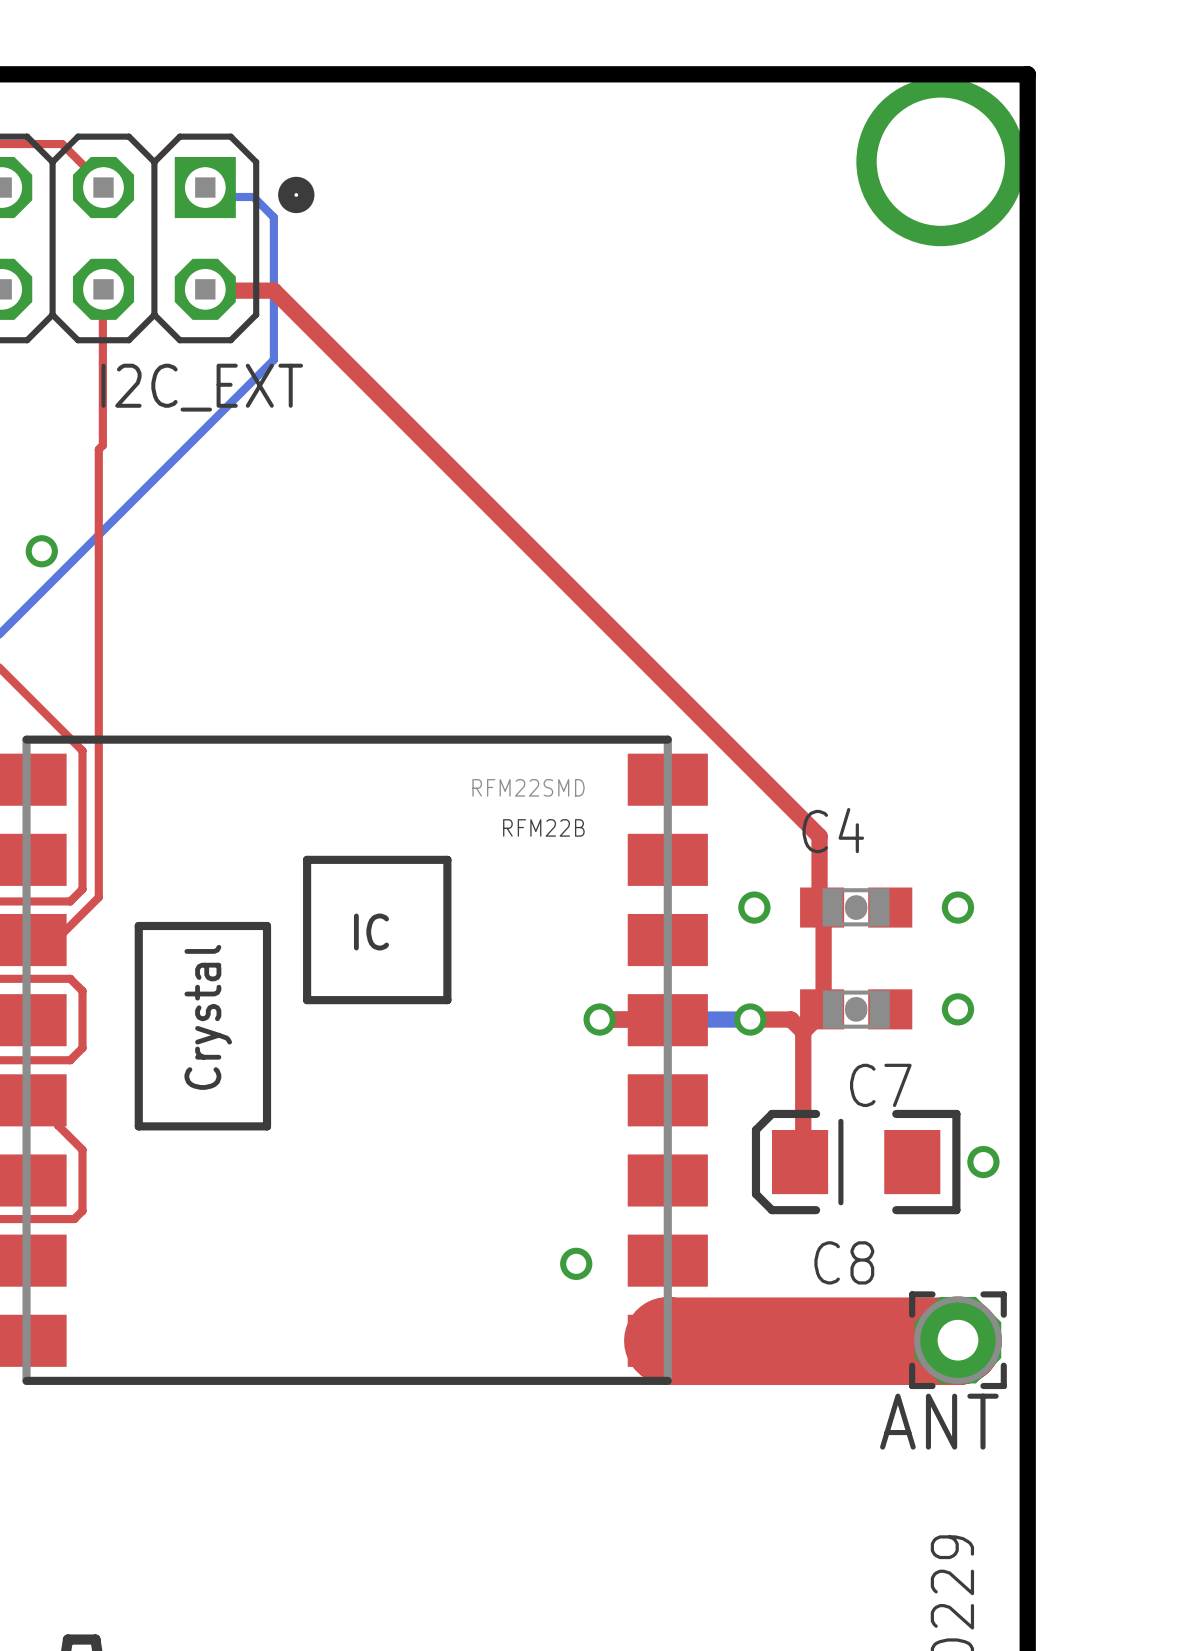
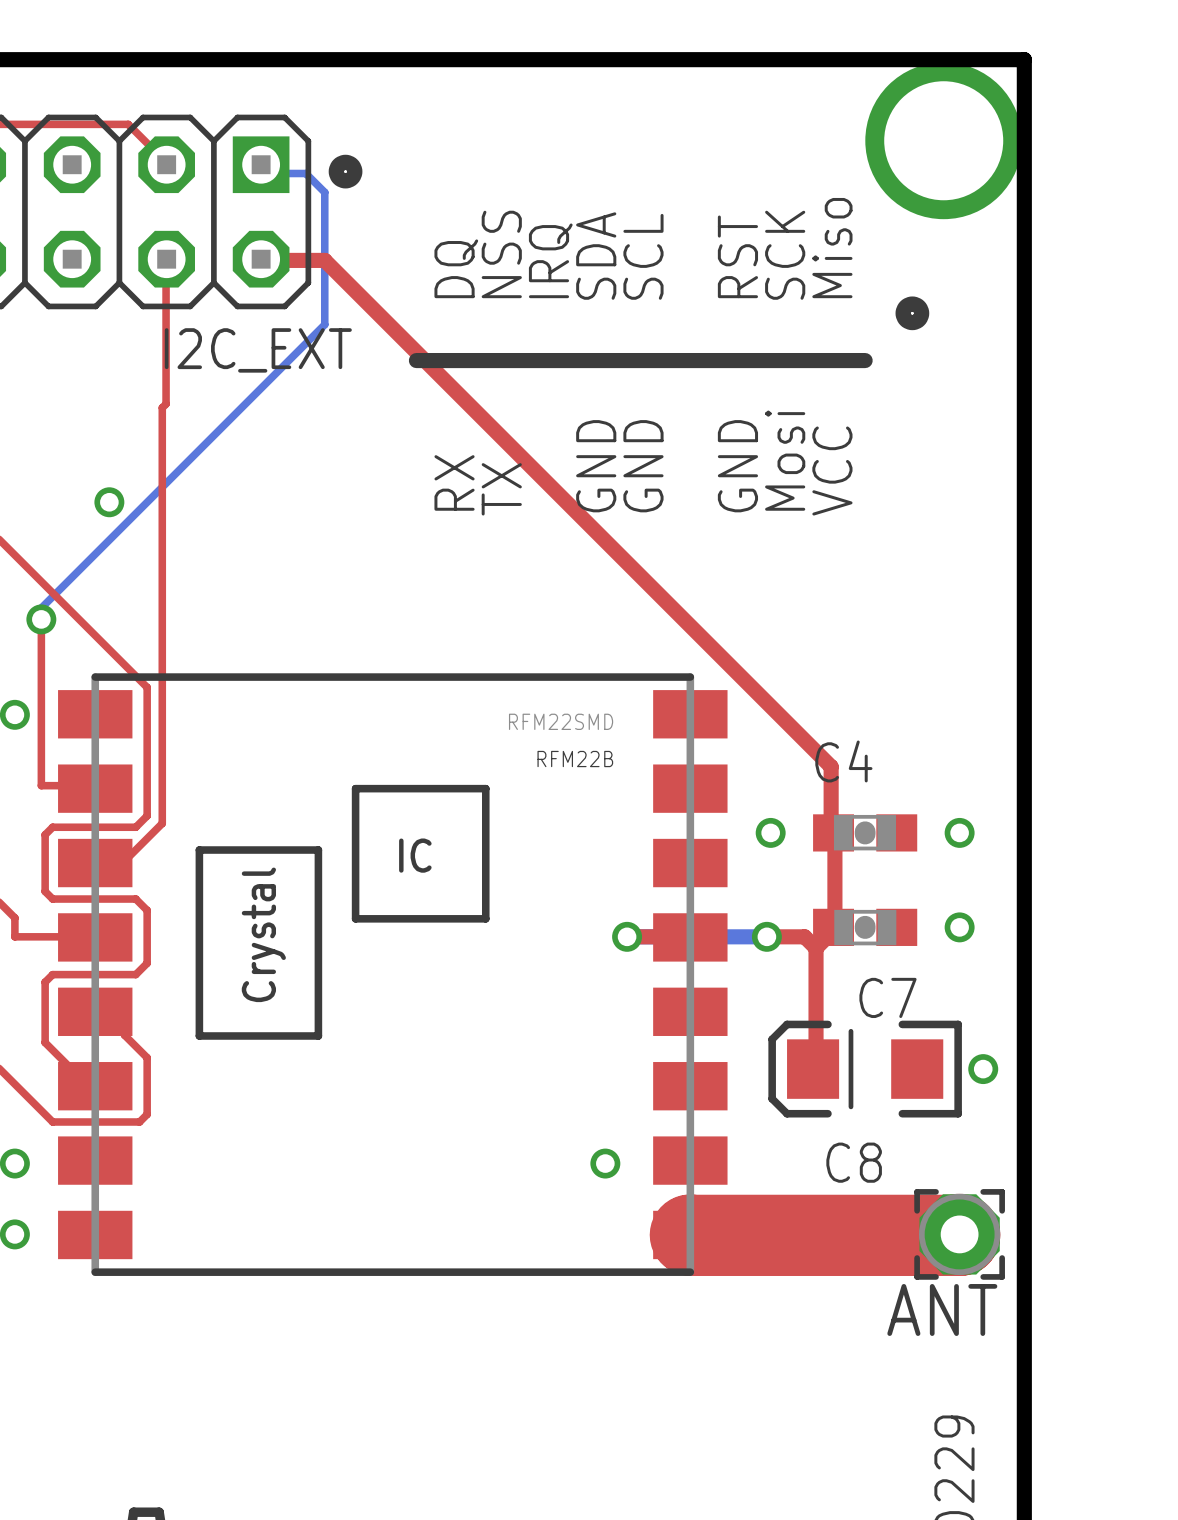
text: none -> Miso (832, 248)
text: none -> NSS (501, 254)
text: none -> SDA (596, 256)
text: none -> SCK (785, 255)
text: none -> SCL (643, 256)
text: none -> RST (737, 256)
text: none -> IRQ (550, 260)
text: none -> DQ (456, 268)
drawing: none -> [895, 296, 930, 331]
line: none -> (416, 360) (865, 360)
text: none -> Mosi (785, 460)
text: none -> GND (596, 466)
text: none -> GND (643, 466)
text: none -> GND (737, 466)
text: none -> VCC (832, 471)
text: none -> RX (454, 482)
text: none -> TX (501, 489)

